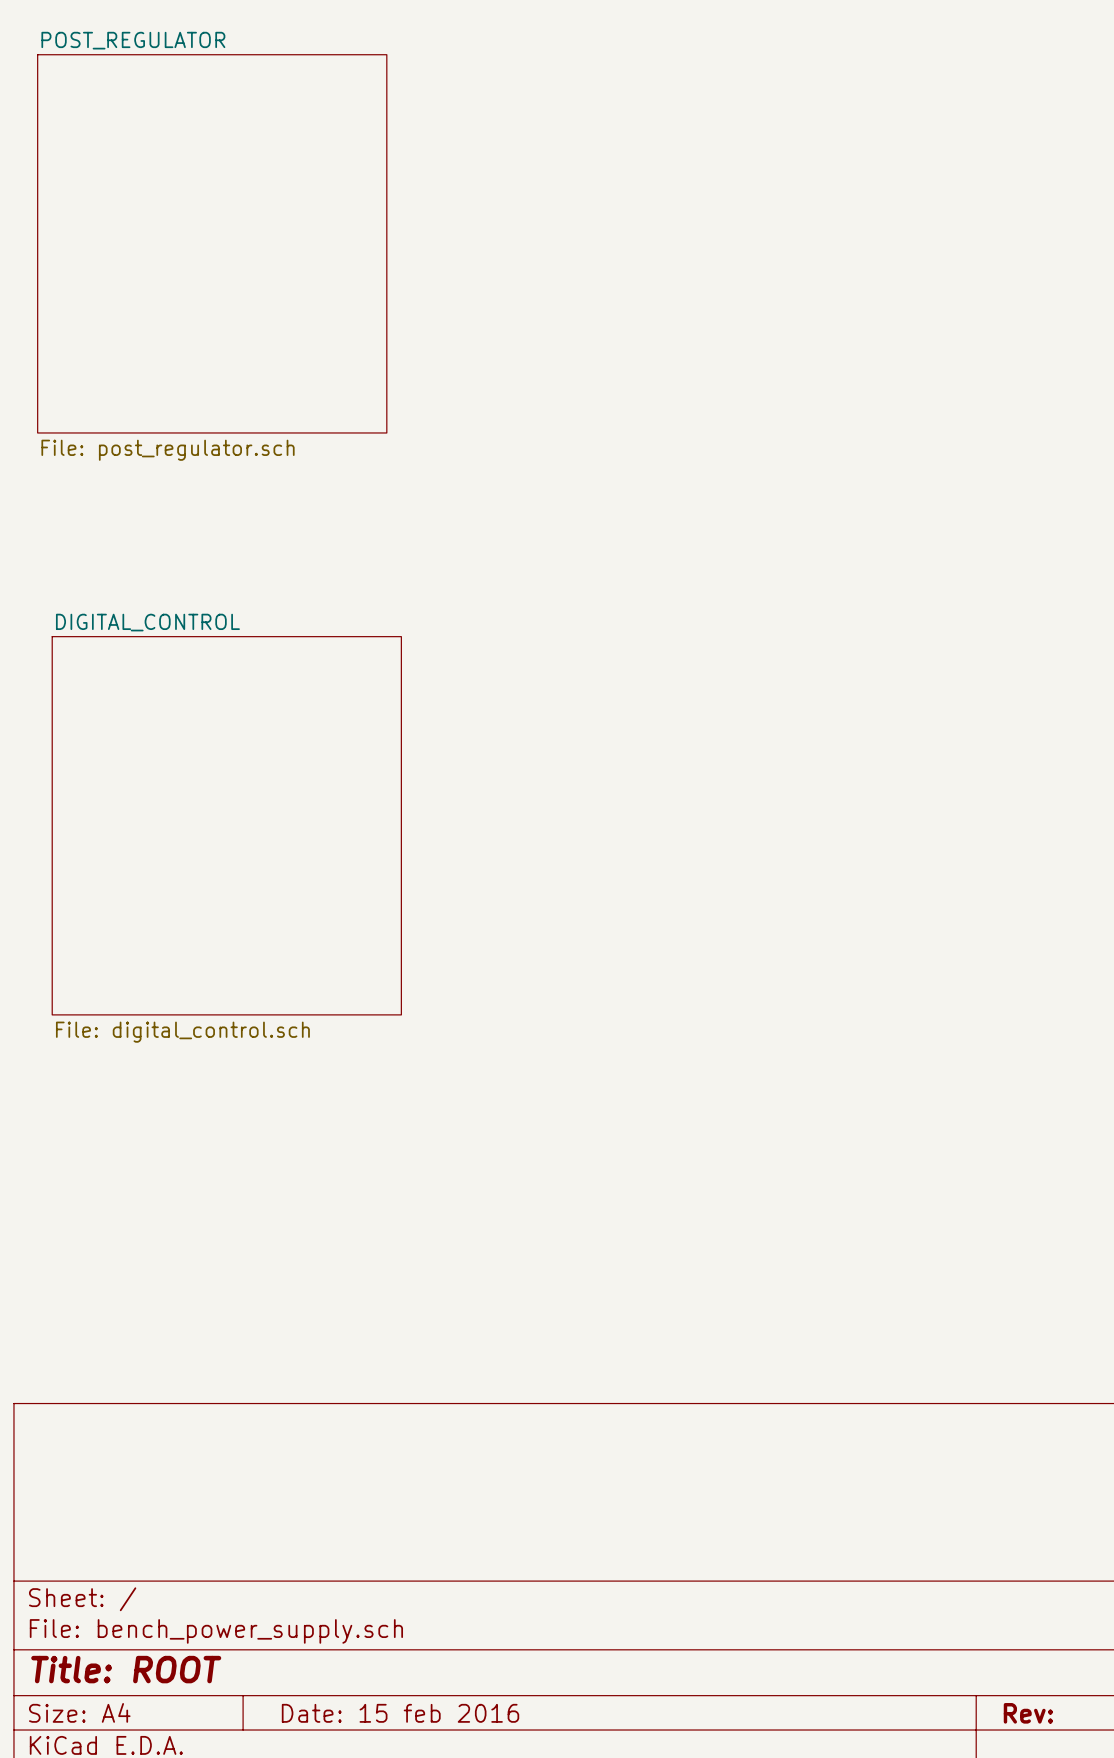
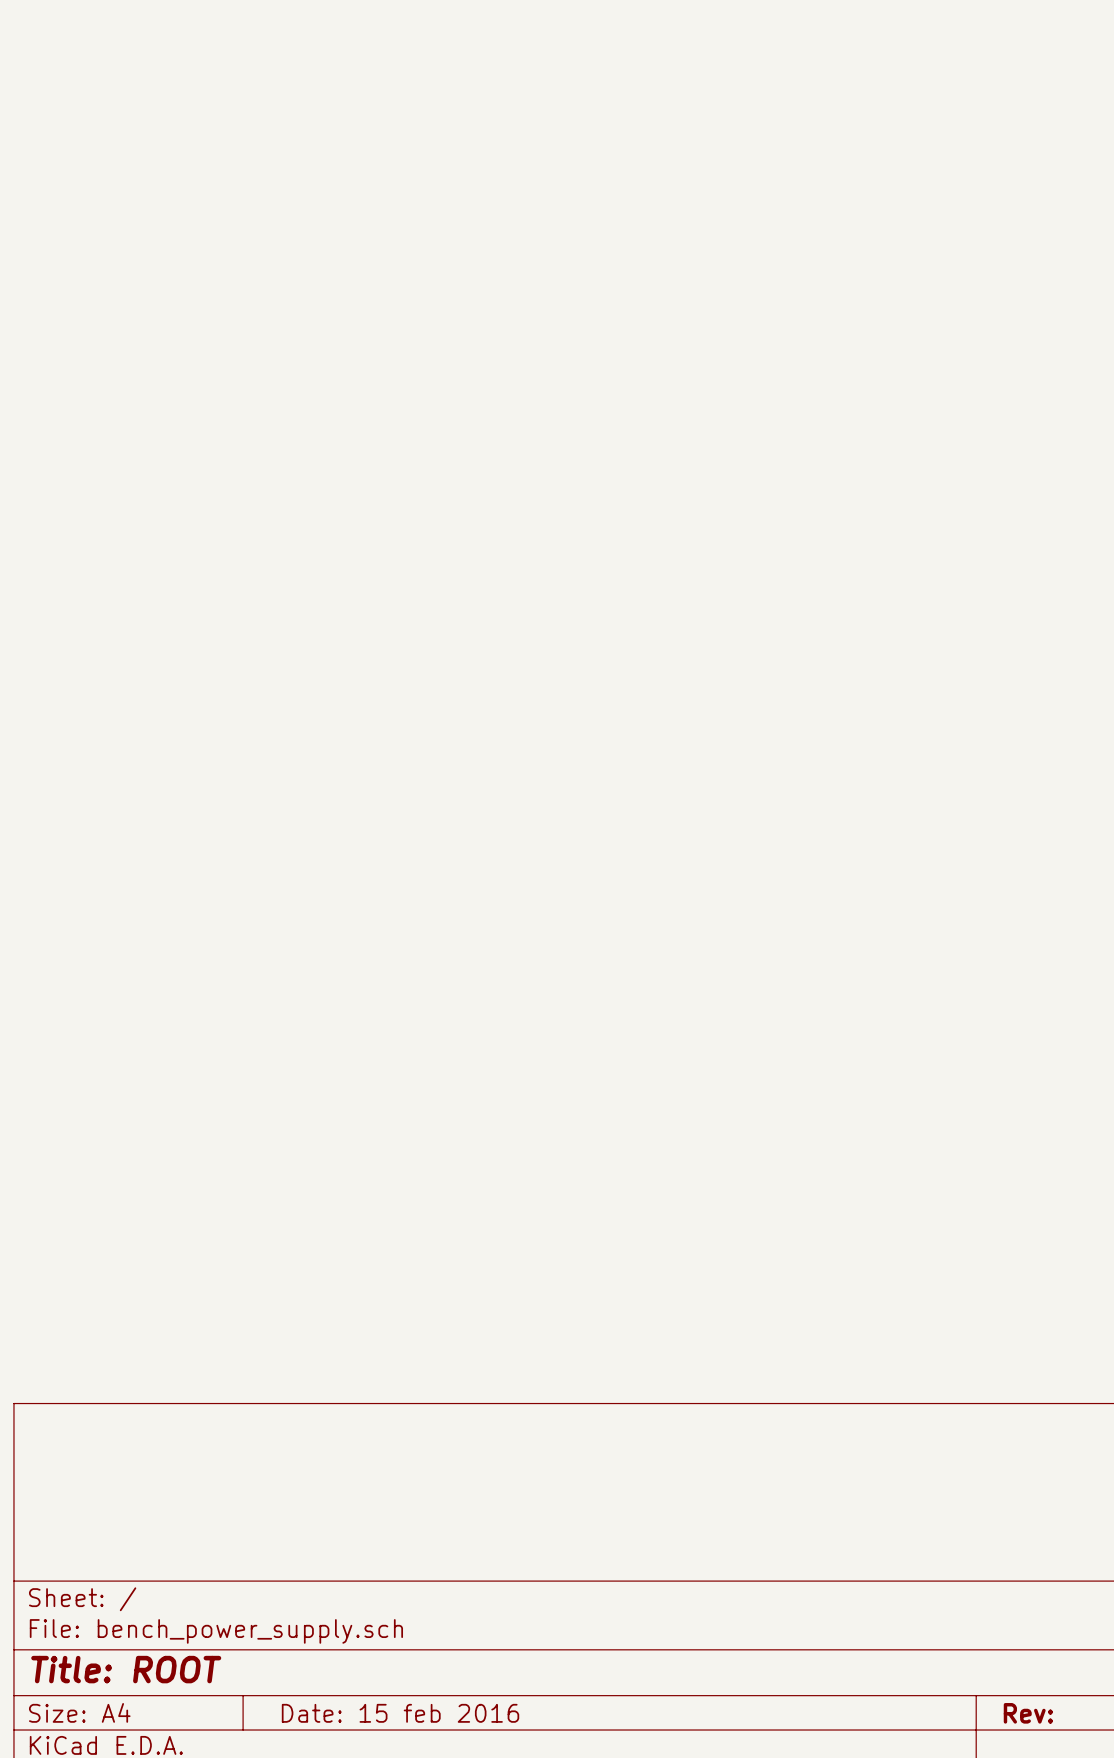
sheet POST_REGULATOR: File: post_regulator.sch (212, 243) -> none
sheet DIGITAL_CONTROL: File: digital_control.sch (226, 825) -> none

